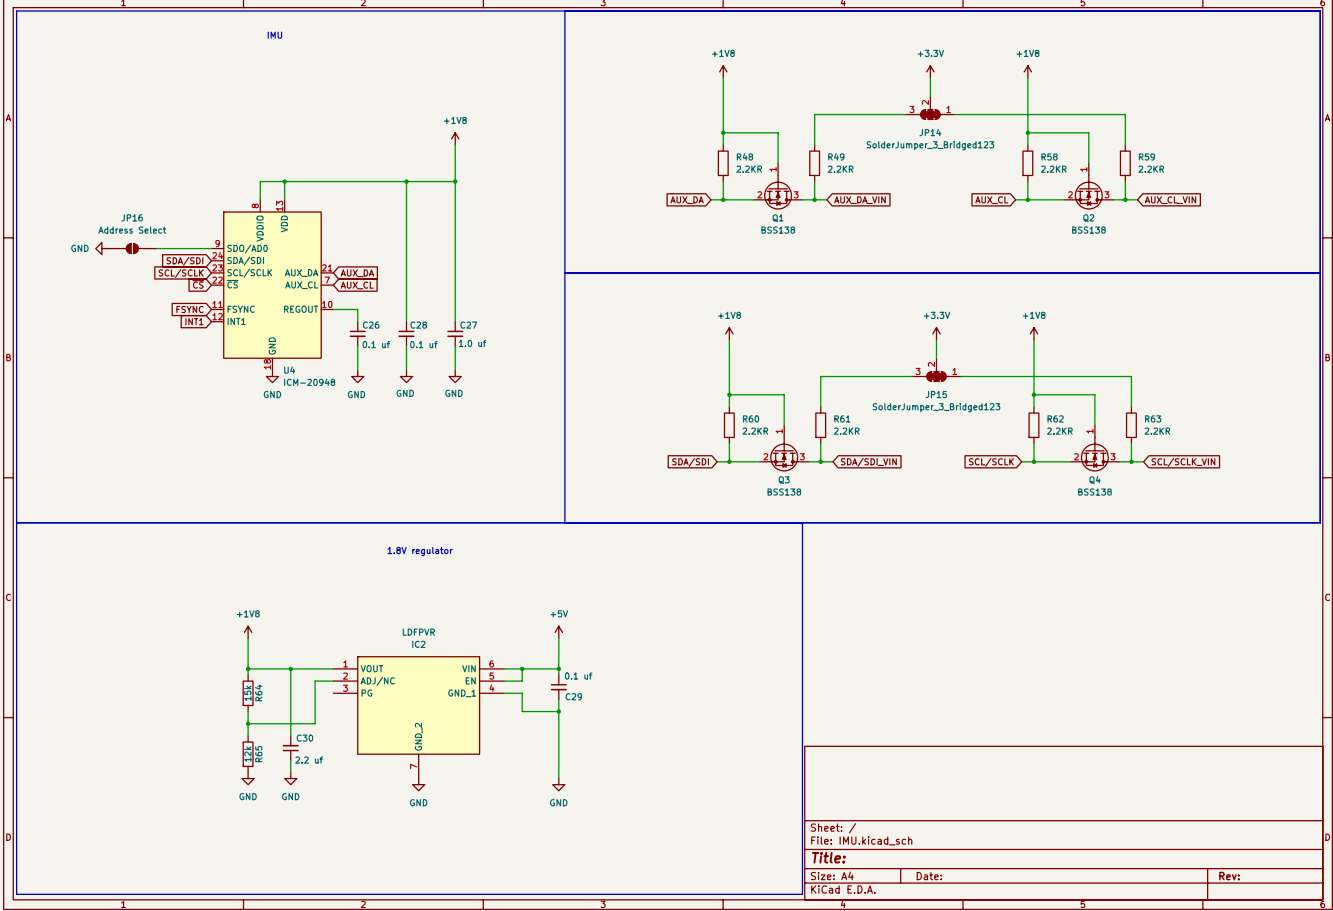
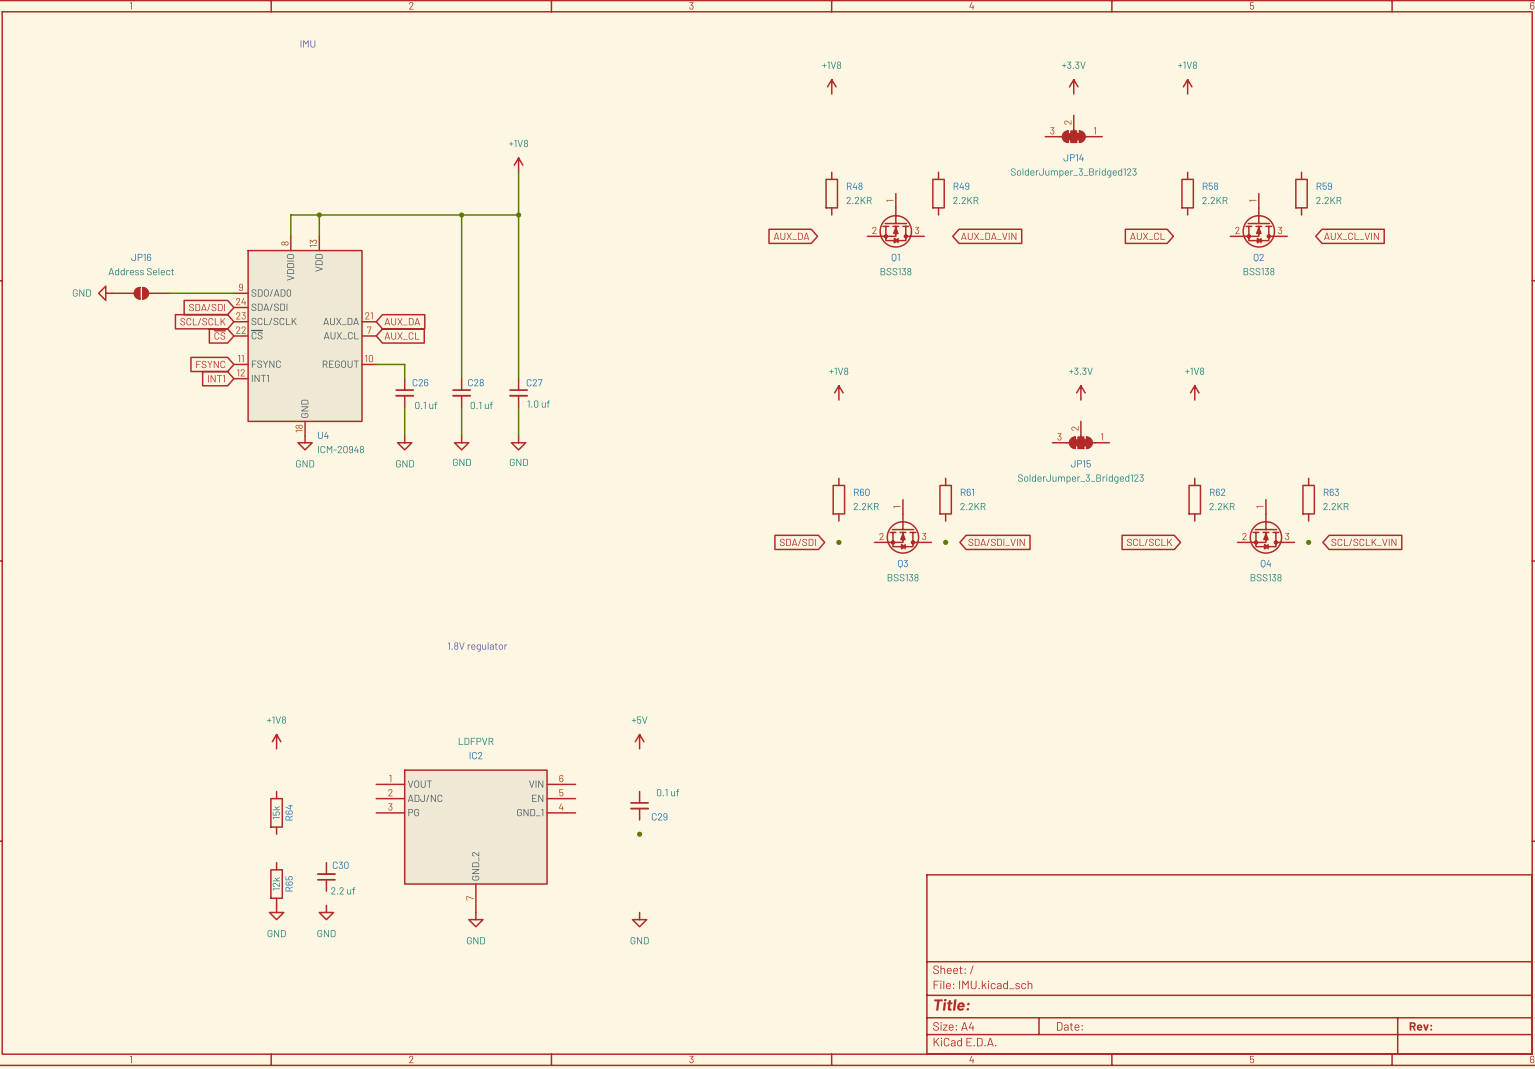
line: (564, 10) (564, 522) -> none
wire: (723, 78) (723, 145) -> none
wire: (930, 78) (930, 96) -> none
wire: (1027, 78) (1027, 145) -> none
wire: (906, 114) (814, 114) (814, 145) -> none
wire: (954, 114) (1125, 114) (1125, 145) -> none
wire: (723, 132) (778, 132) (778, 163) -> none
junction: (723, 132) -> none
wire: (1027, 132) (1088, 132) (1088, 163) -> none
junction: (1027, 132) -> none
wire: (723, 181) (723, 199) -> none
wire: (814, 181) (814, 199) -> none
wire: (1027, 181) (1027, 199) -> none
wire: (1125, 181) (1125, 199) -> none
wire: (711, 199) (753, 199) -> none
junction: (723, 199) -> none
wire: (802, 199) (826, 199) -> none
junction: (814, 199) -> none
wire: (1015, 199) (1064, 199) -> none
junction: (1027, 199) -> none
wire: (1113, 199) (1137, 199) -> none
junction: (1125, 199) -> none
line: (564, 272) (1320, 272) -> none
wire: (729, 339) (729, 406) -> none
wire: (936, 339) (936, 358) -> none
wire: (1033, 339) (1033, 406) -> none
wire: (912, 376) (820, 376) (820, 406) -> none
wire: (960, 376) (1131, 376) (1131, 406) -> none
wire: (729, 394) (784, 394) (784, 425) -> none
junction: (729, 394) -> none
wire: (1033, 394) (1094, 394) (1094, 425) -> none
junction: (1033, 394) -> none
wire: (729, 443) (729, 461) -> none
wire: (820, 443) (820, 461) -> none
wire: (1033, 443) (1033, 461) -> none
wire: (1131, 443) (1131, 461) -> none
wire: (717, 461) (759, 461) -> none
wire: (808, 461) (832, 461) -> none
wire: (1021, 461) (1070, 461) -> none
junction: (1033, 461) -> none
wire: (1119, 461) (1143, 461) -> none
line: (16, 522) (1320, 522) (1320, 10) (16, 10) (16, 894) (802, 894) (802, 522) -> none
wire: (248, 638) (248, 675) -> none
wire: (558, 638) (558, 675) -> none
wire: (248, 668) (333, 668) -> none
junction: (248, 668) -> none
wire: (290, 668) (290, 735) -> none
junction: (290, 668) -> none
wire: (503, 668) (558, 668) -> none
wire: (522, 668) (522, 681) (503, 681) -> none
junction: (522, 668) -> none
junction: (558, 668) -> none
wire: (333, 681) (315, 681) (315, 723) (248, 723) -> none
wire: (503, 693) (522, 693) (522, 711) (558, 711) -> none
wire: (558, 699) (558, 778) -> none
wire: (248, 711) (248, 735) -> none
junction: (248, 723) -> none
wire: (290, 760) (290, 772) -> none

